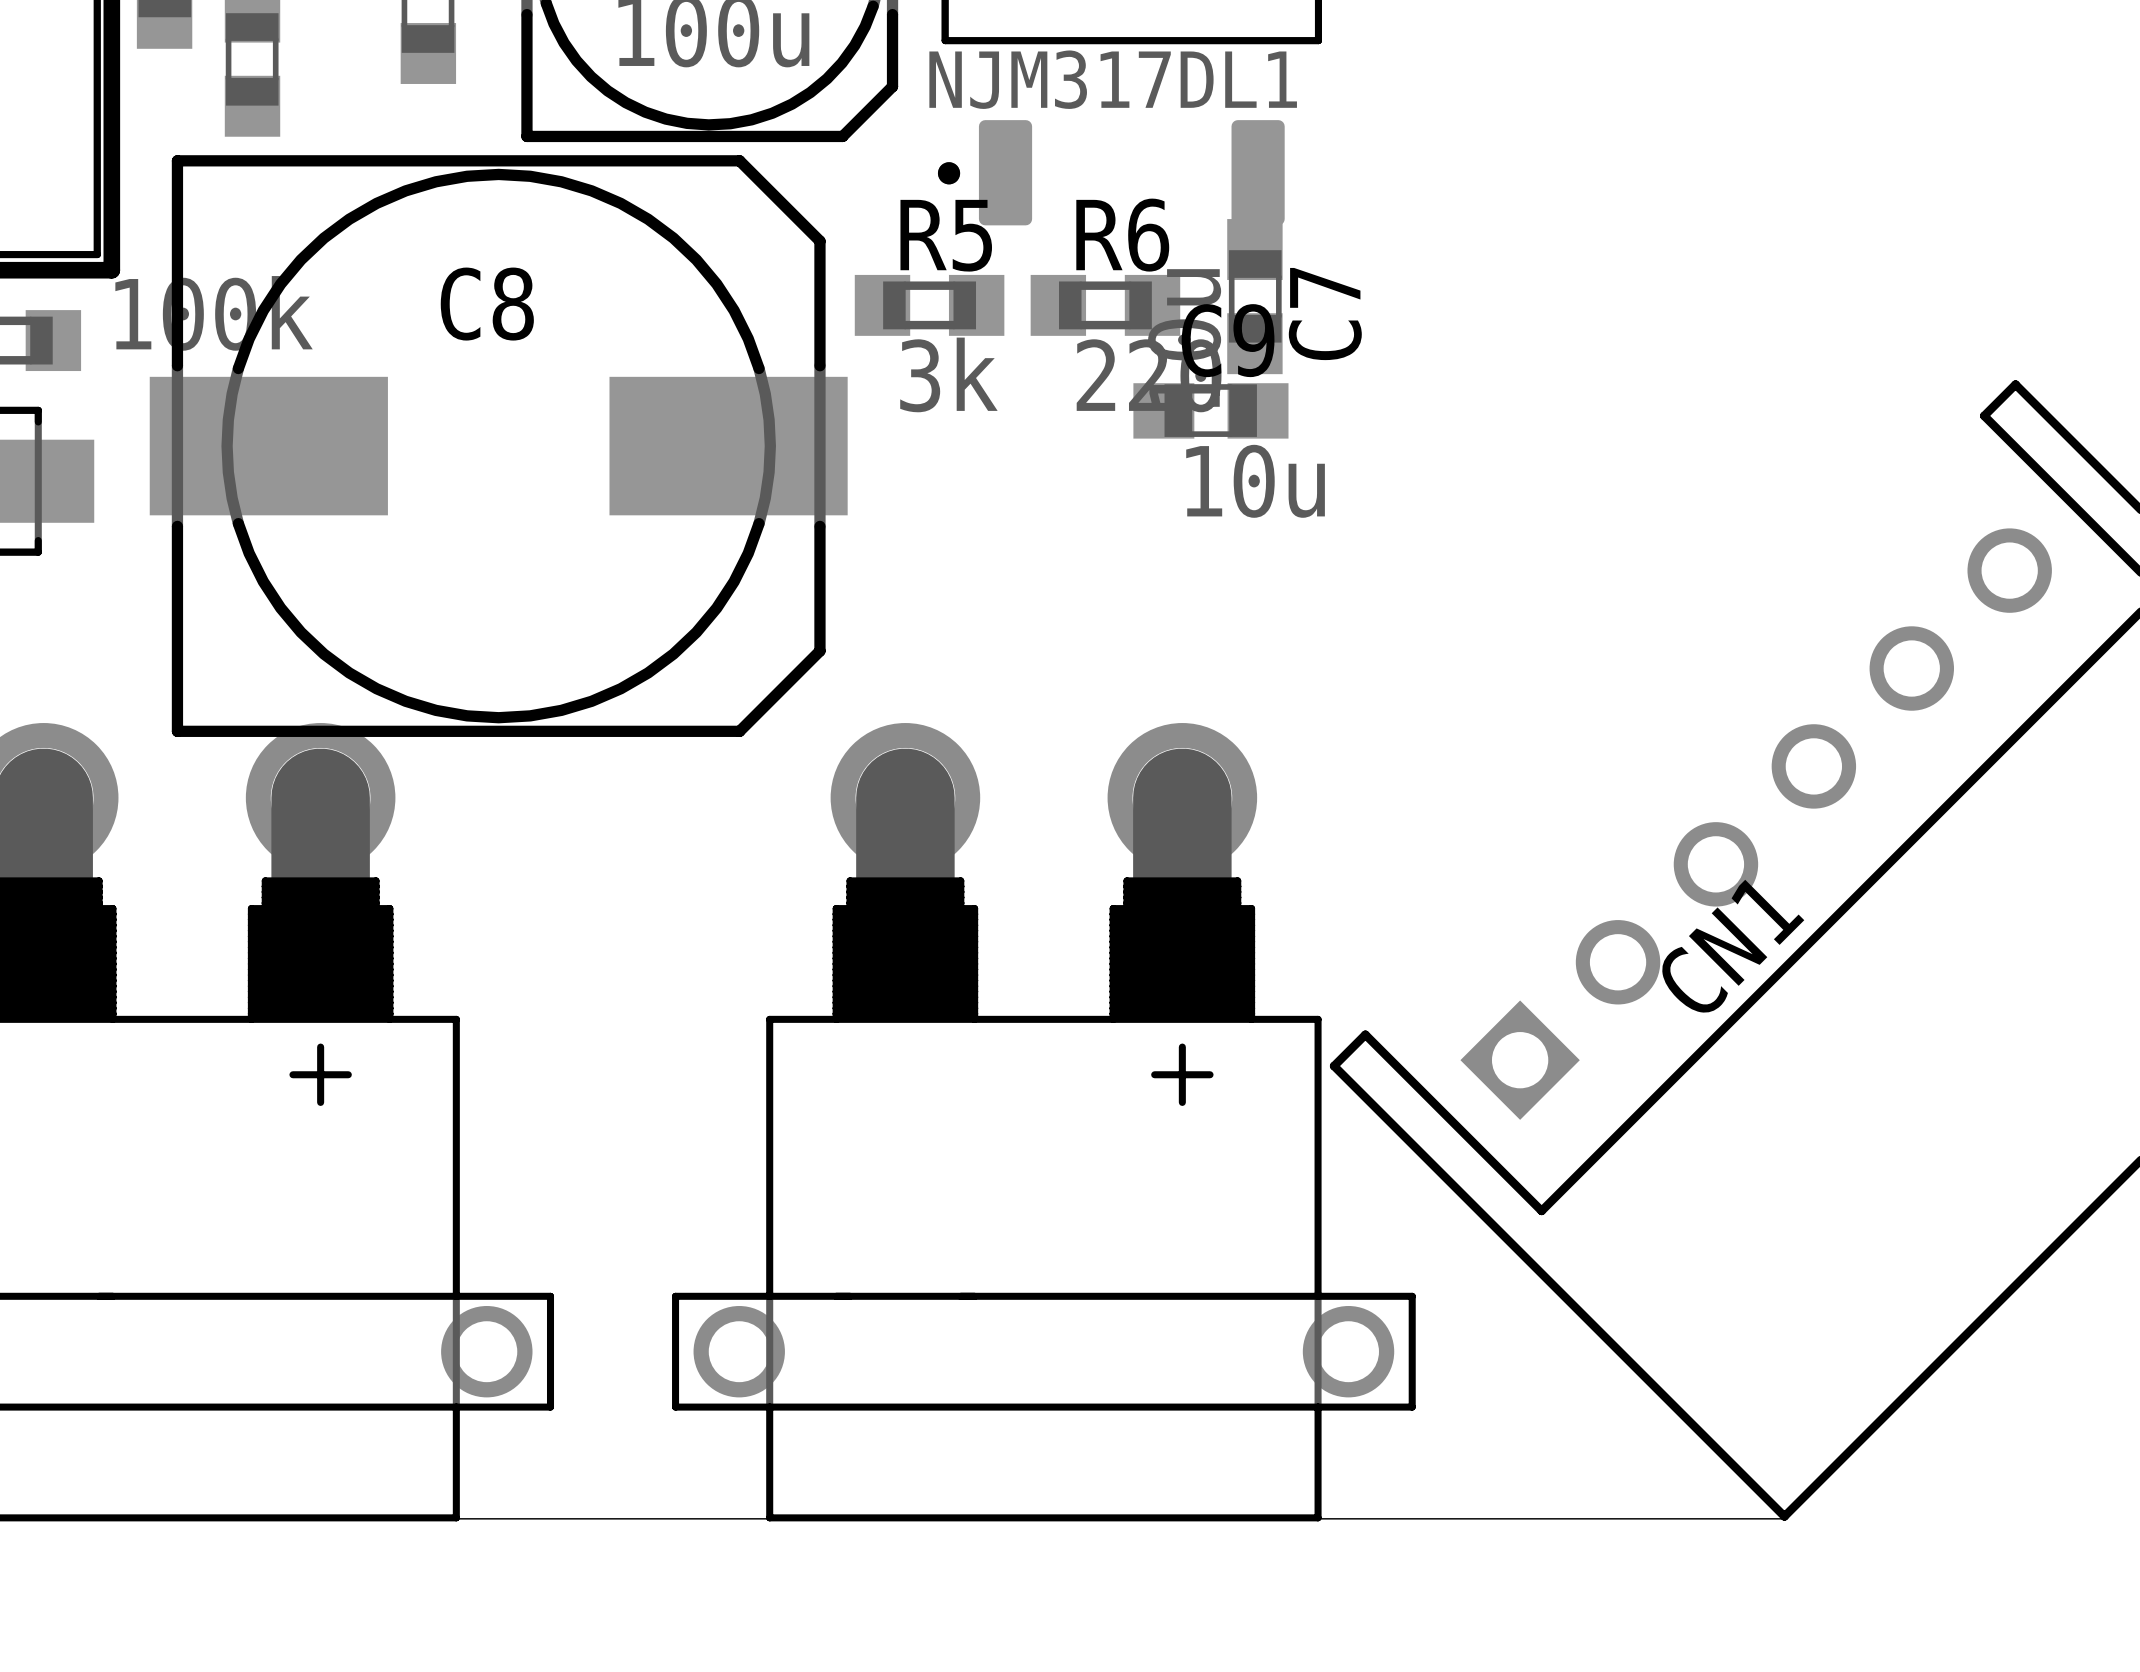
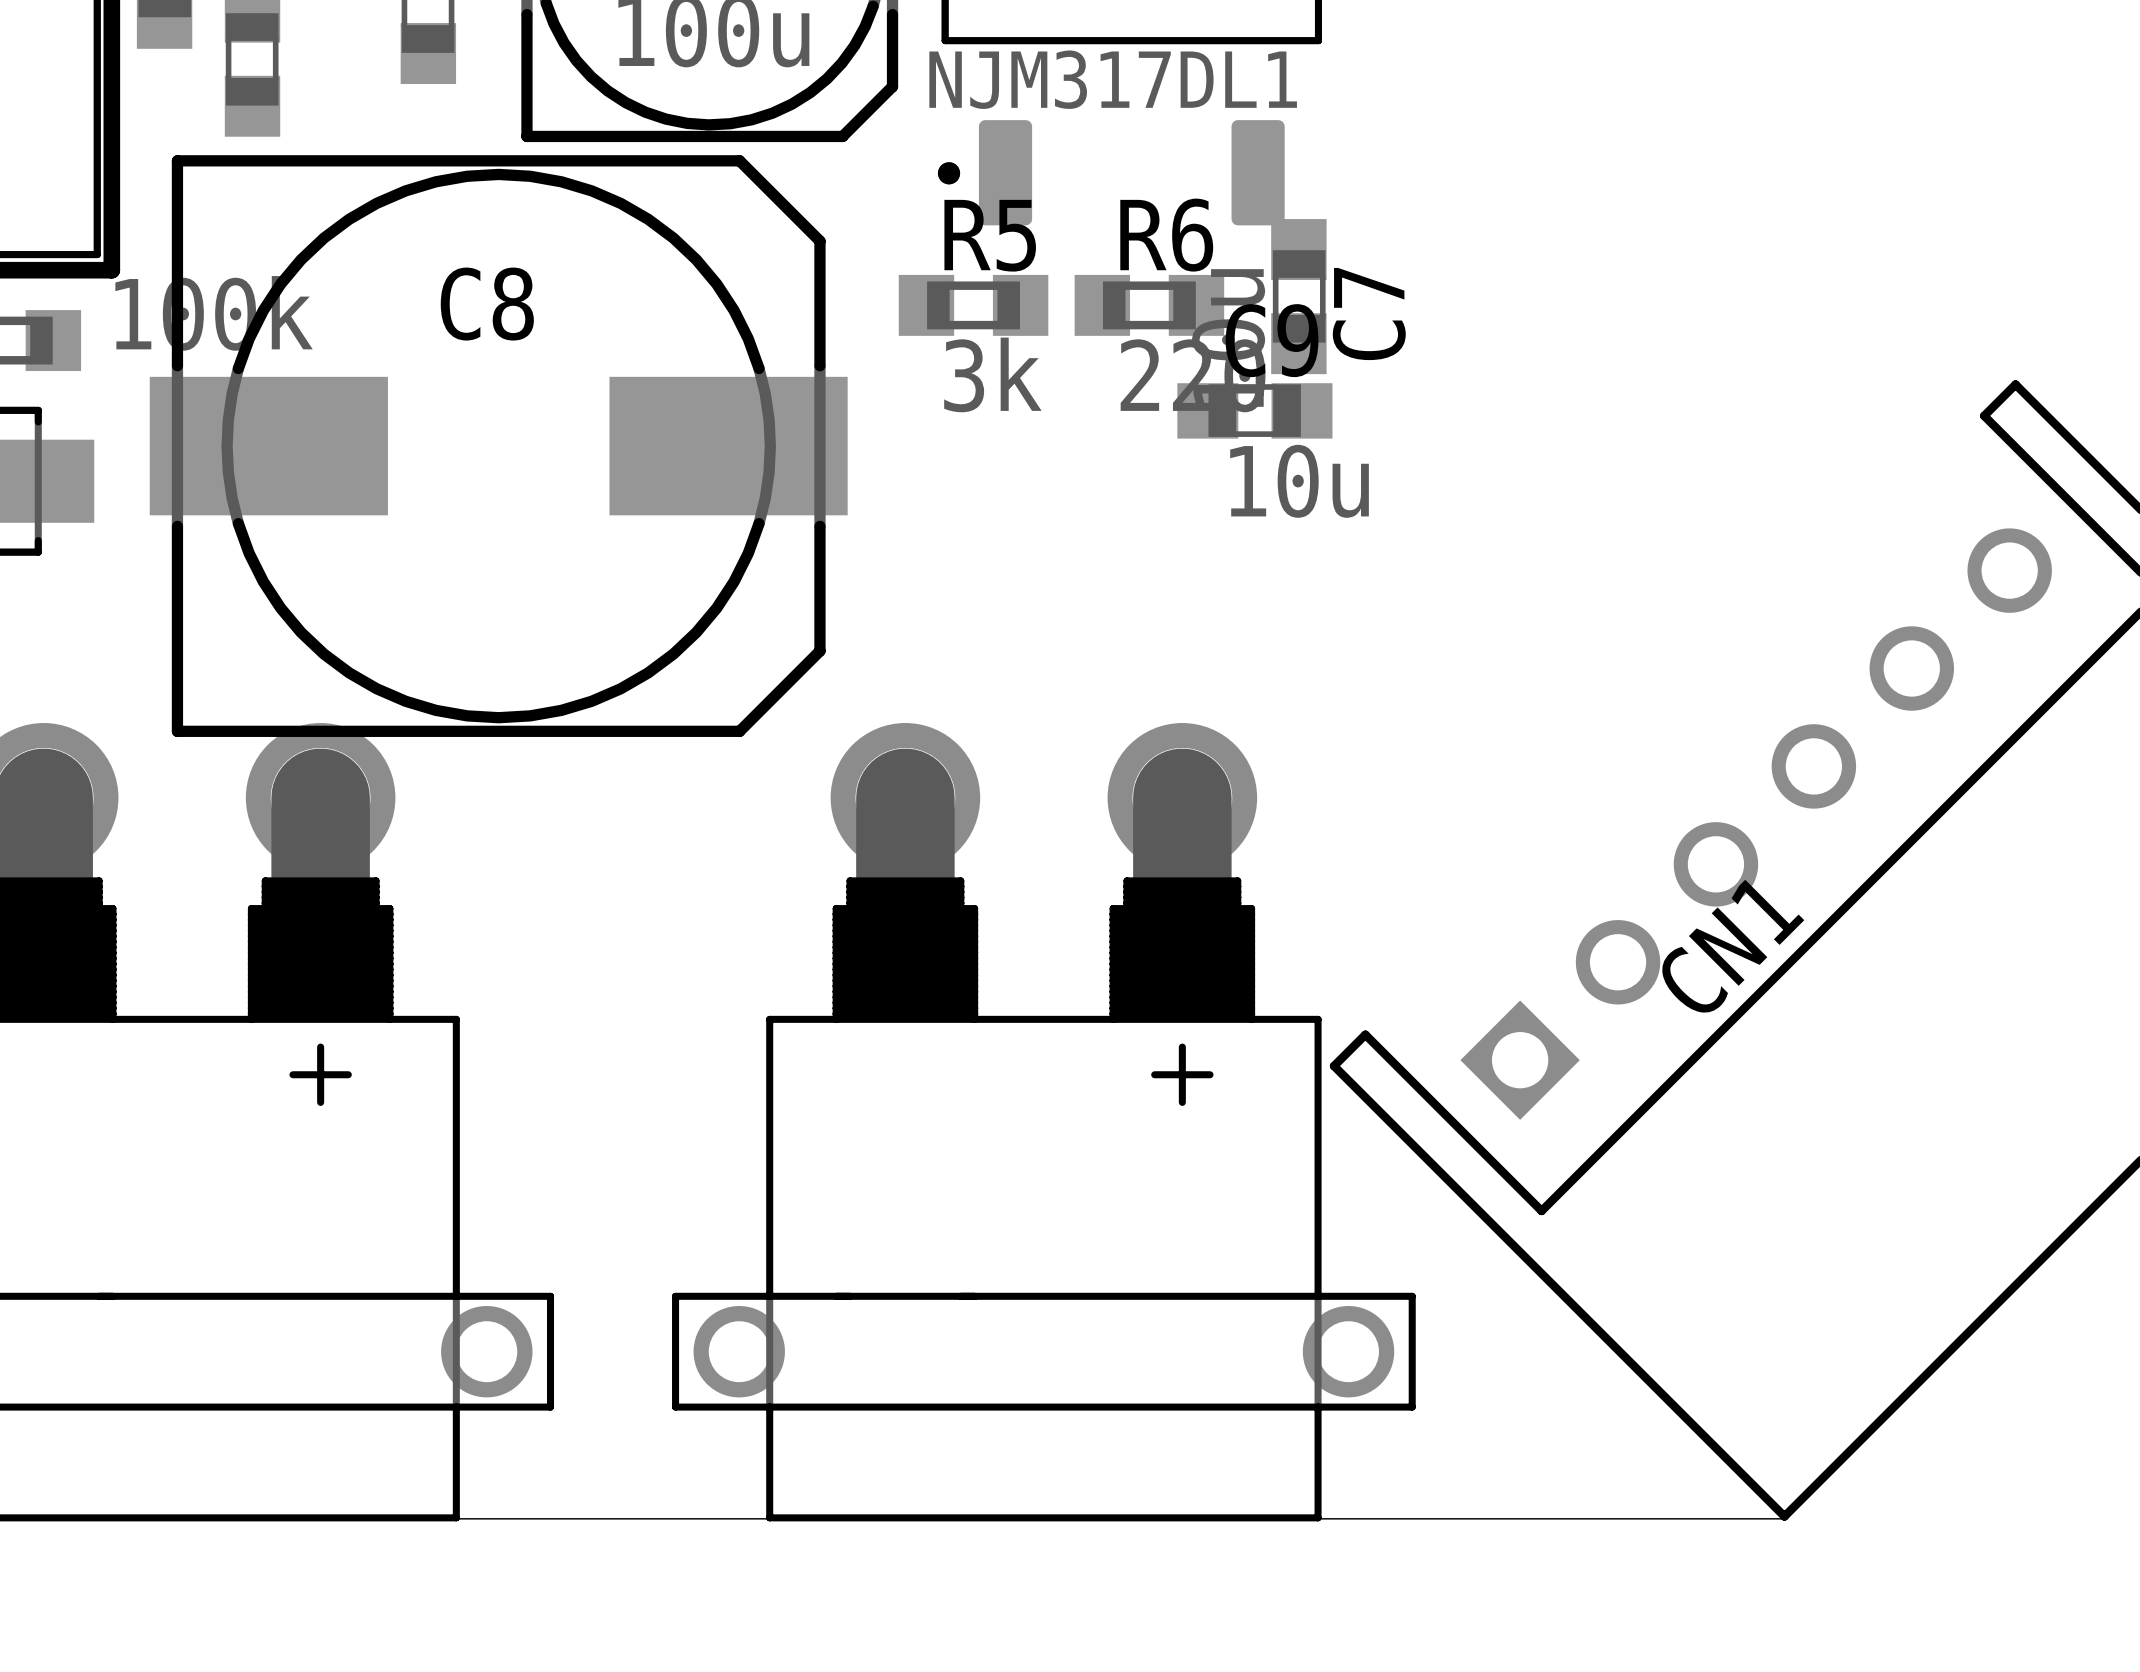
C7 position: (1254, 296) -> (1298, 296)
R5 position: (929, 305) -> (973, 305)
R6 position: (1105, 305) -> (1149, 305)
C9 position: (1210, 410) -> (1254, 410)

